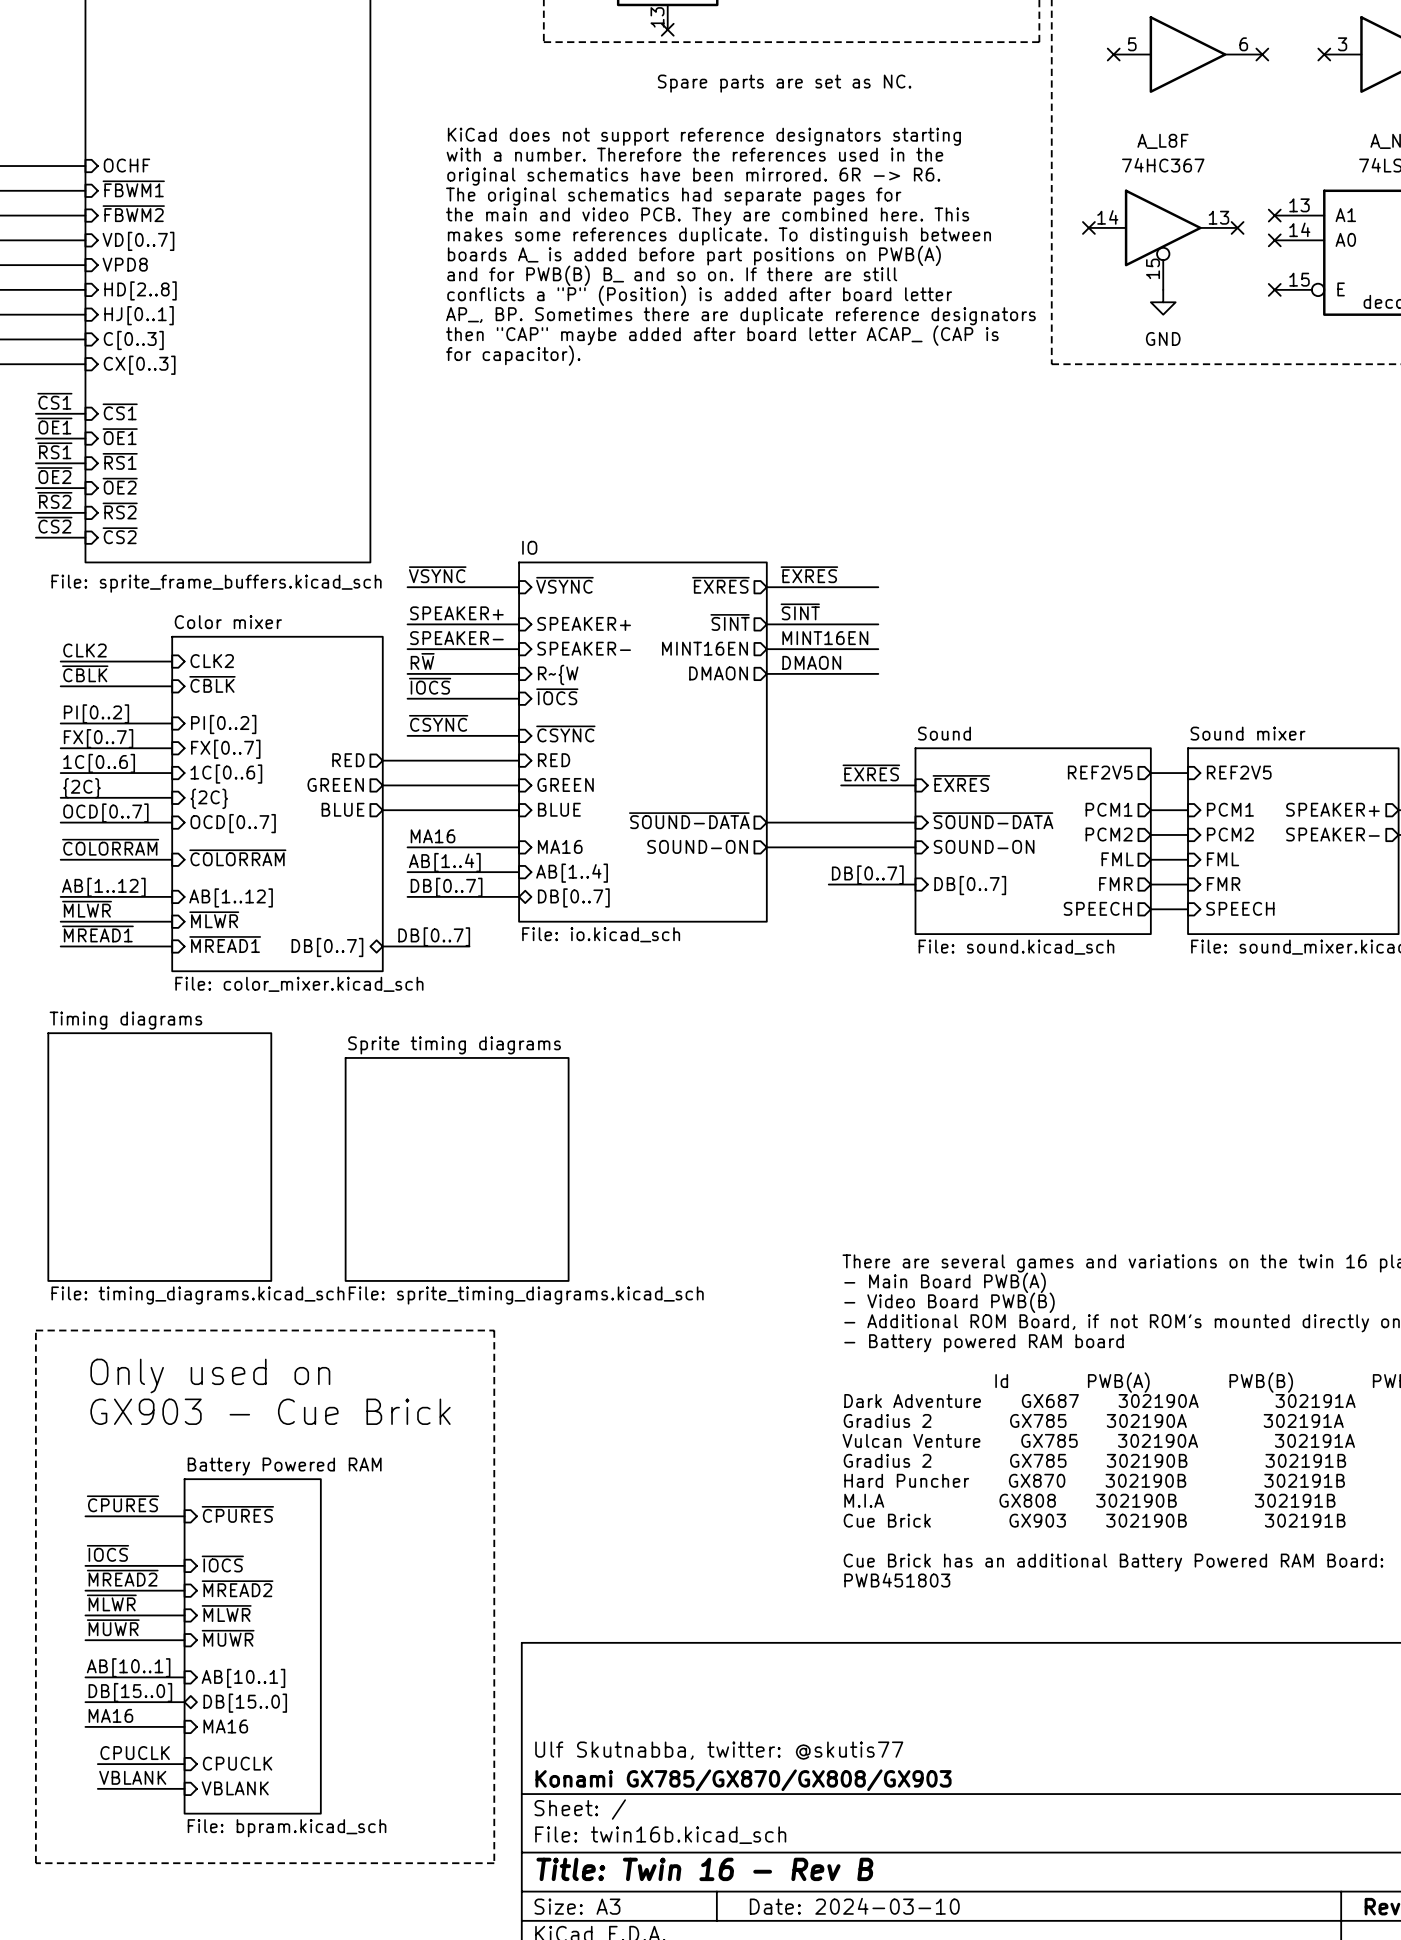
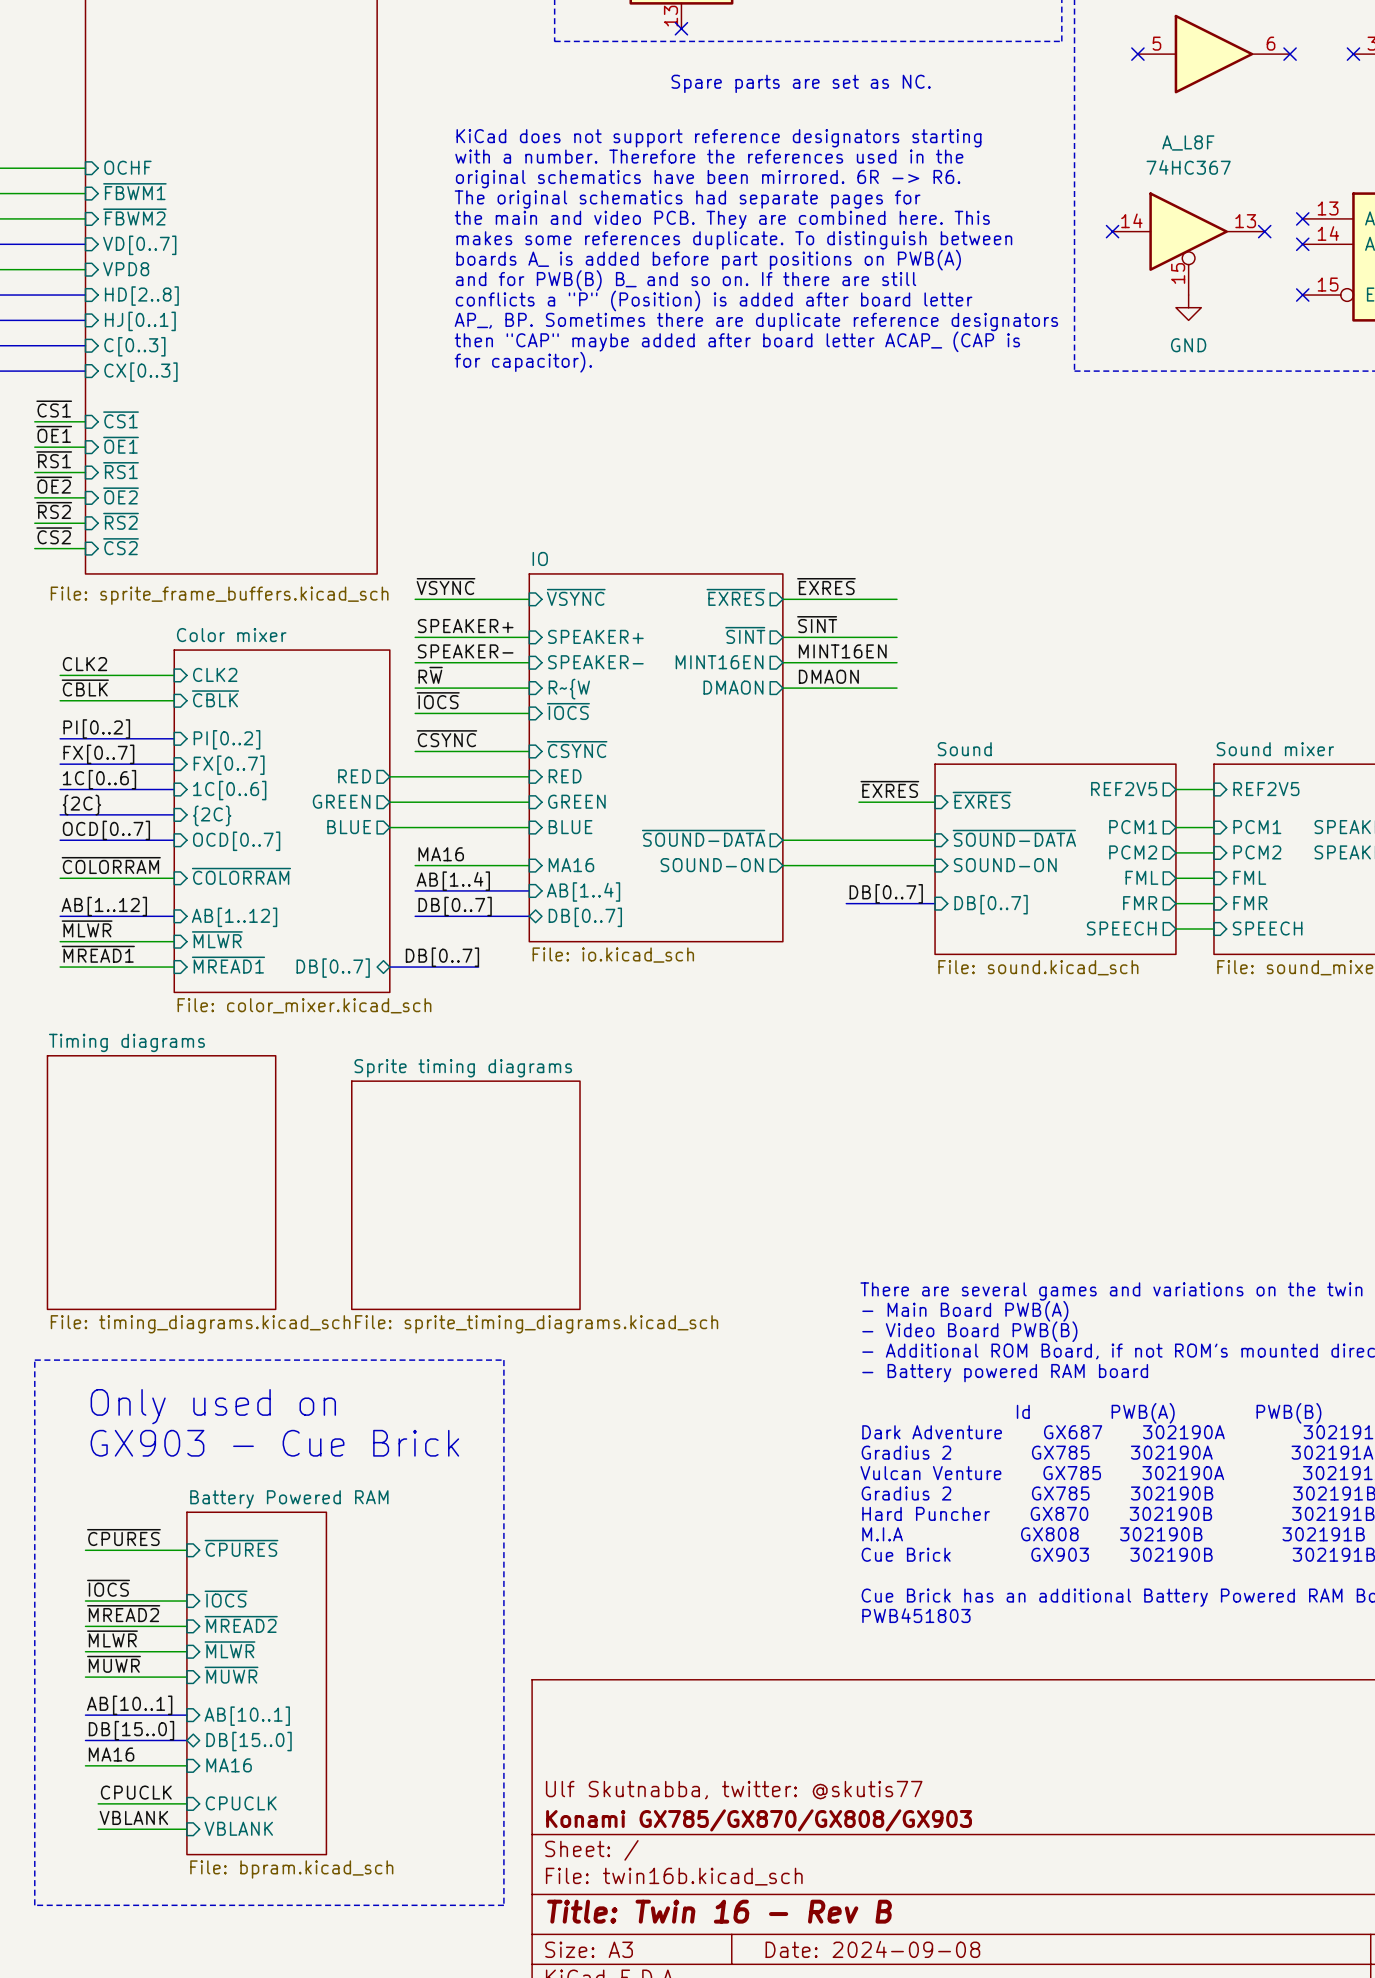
title block: Date: 2024-03-10 (854, 1906) -> Date: 2024-09-08 (872, 1949)

